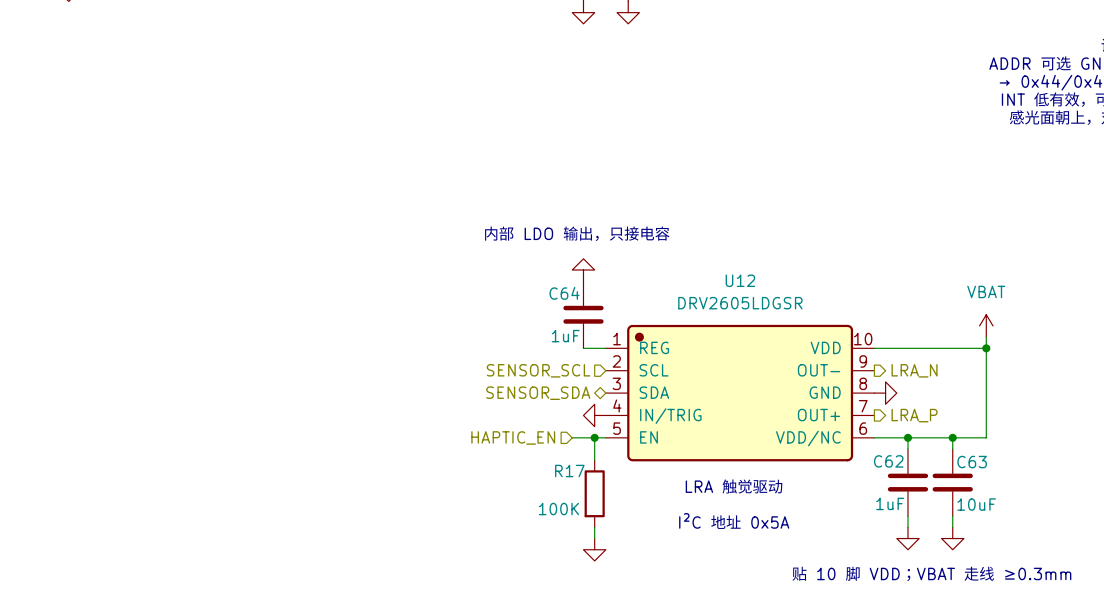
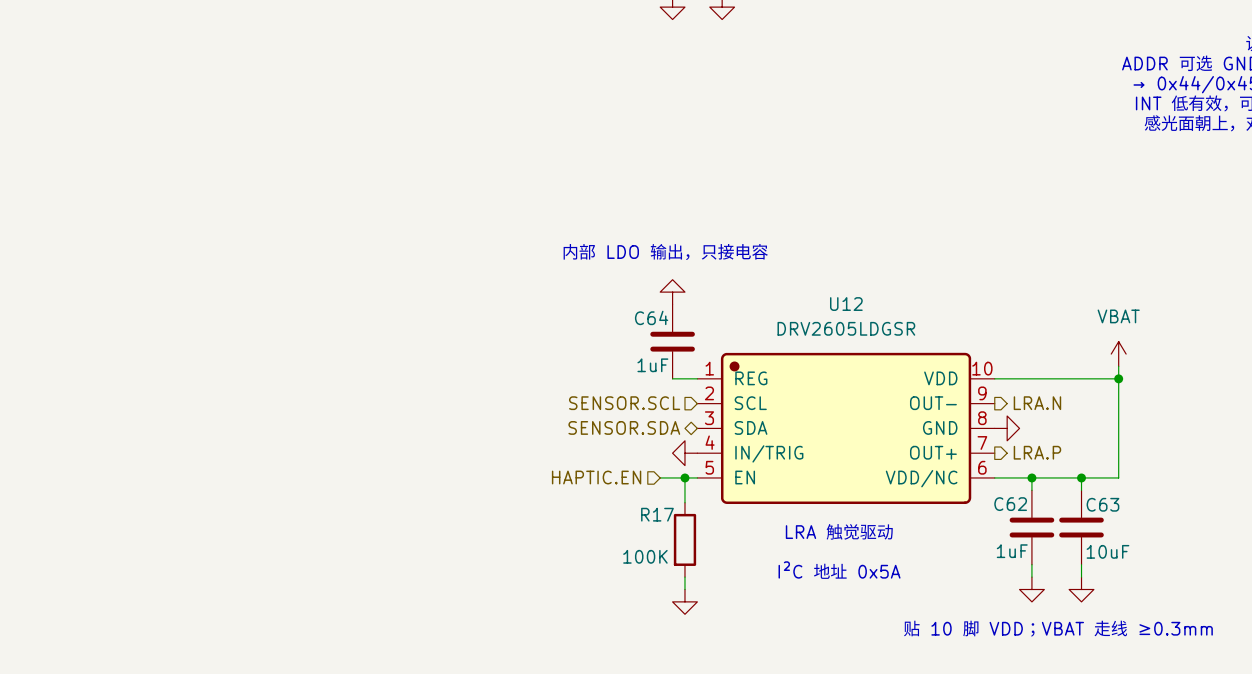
hierarchical label: SENSOR_SCL (538, 370) -> SENSOR.SCL (624, 403)
hierarchical label: LRA_N (914, 370) -> LRA.N (1037, 403)
hierarchical label: SENSOR_SDA (538, 393) -> SENSOR.SDA (624, 427)
hierarchical label: LRA_P (914, 415) -> LRA.P (1037, 452)
hierarchical label: HAPTIC_EN (513, 437) -> HAPTIC.EN (596, 477)

